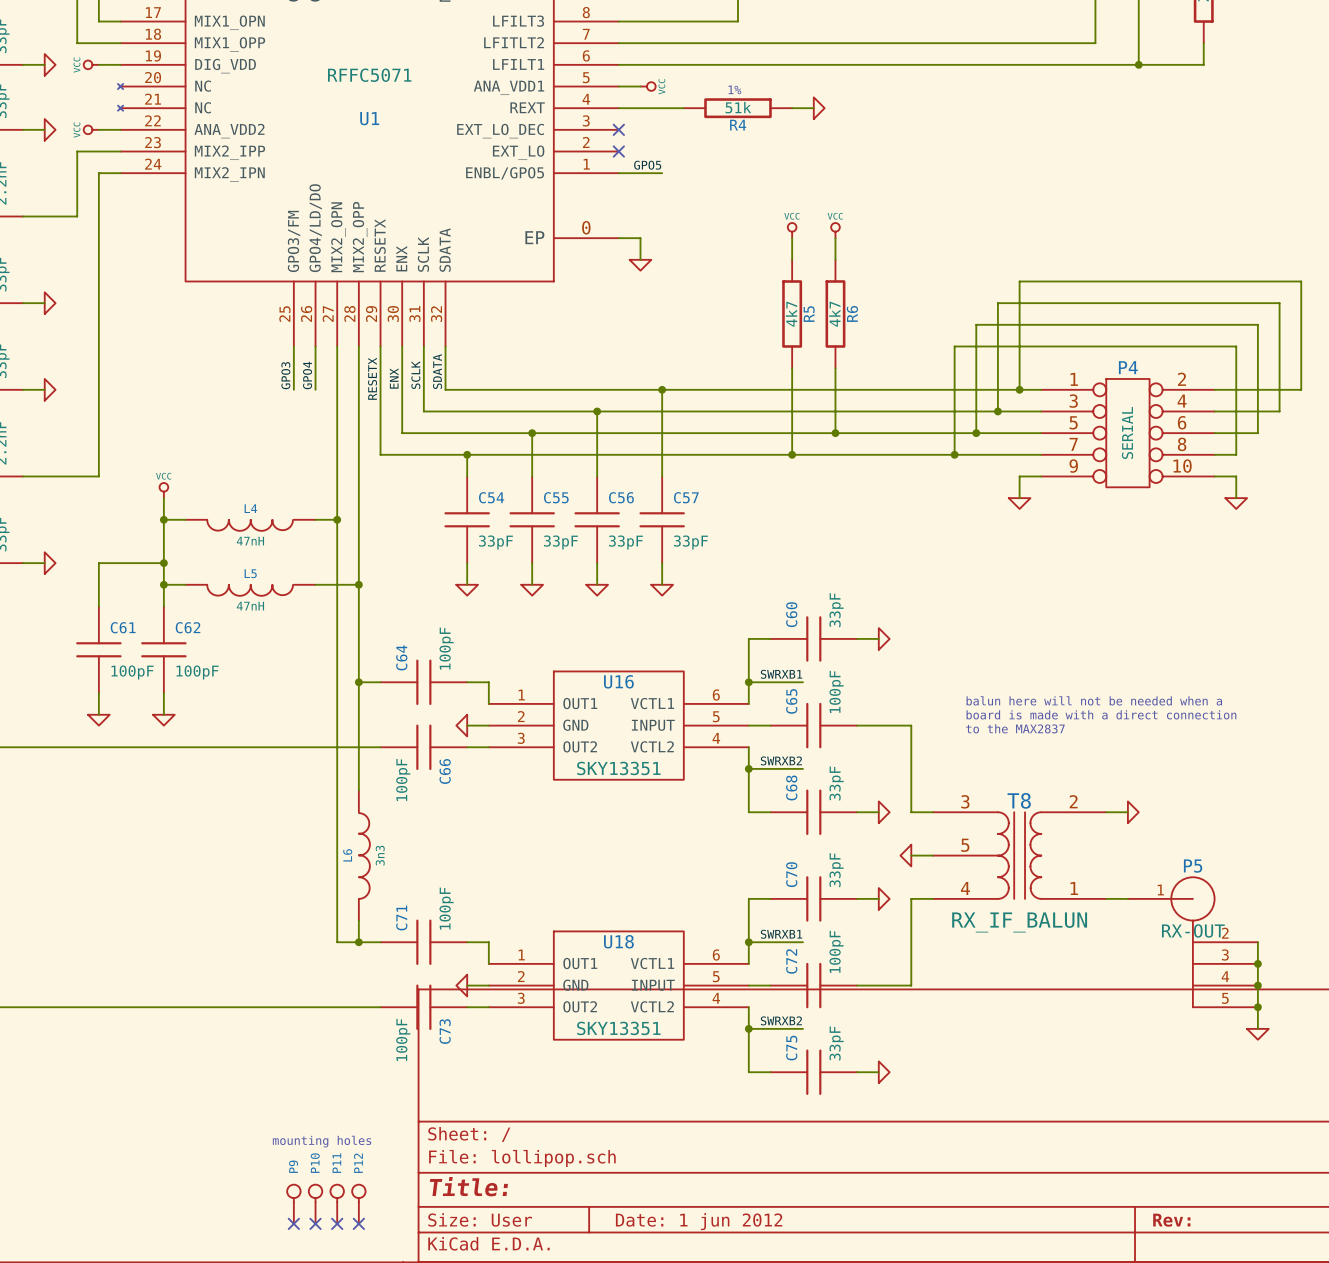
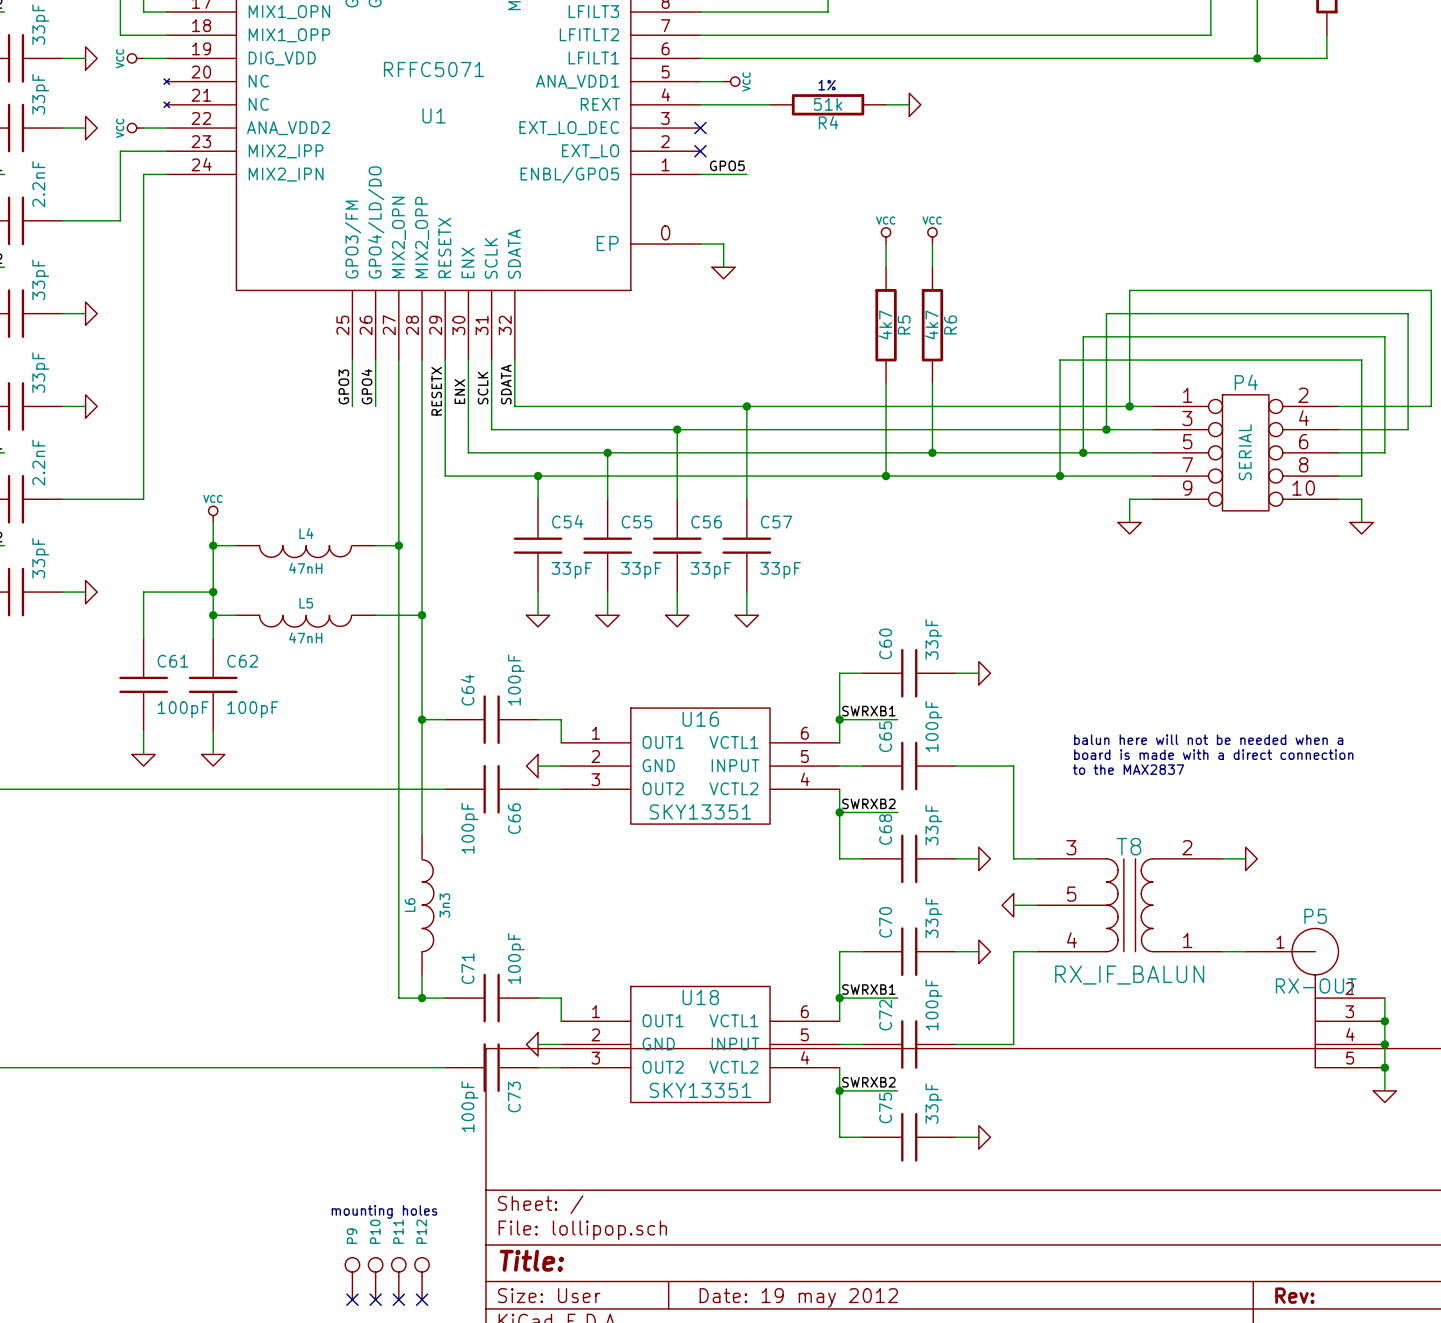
title block: Date: 1 jun 2012 (699, 1221) -> Date: 19 may 2012 (798, 1297)

